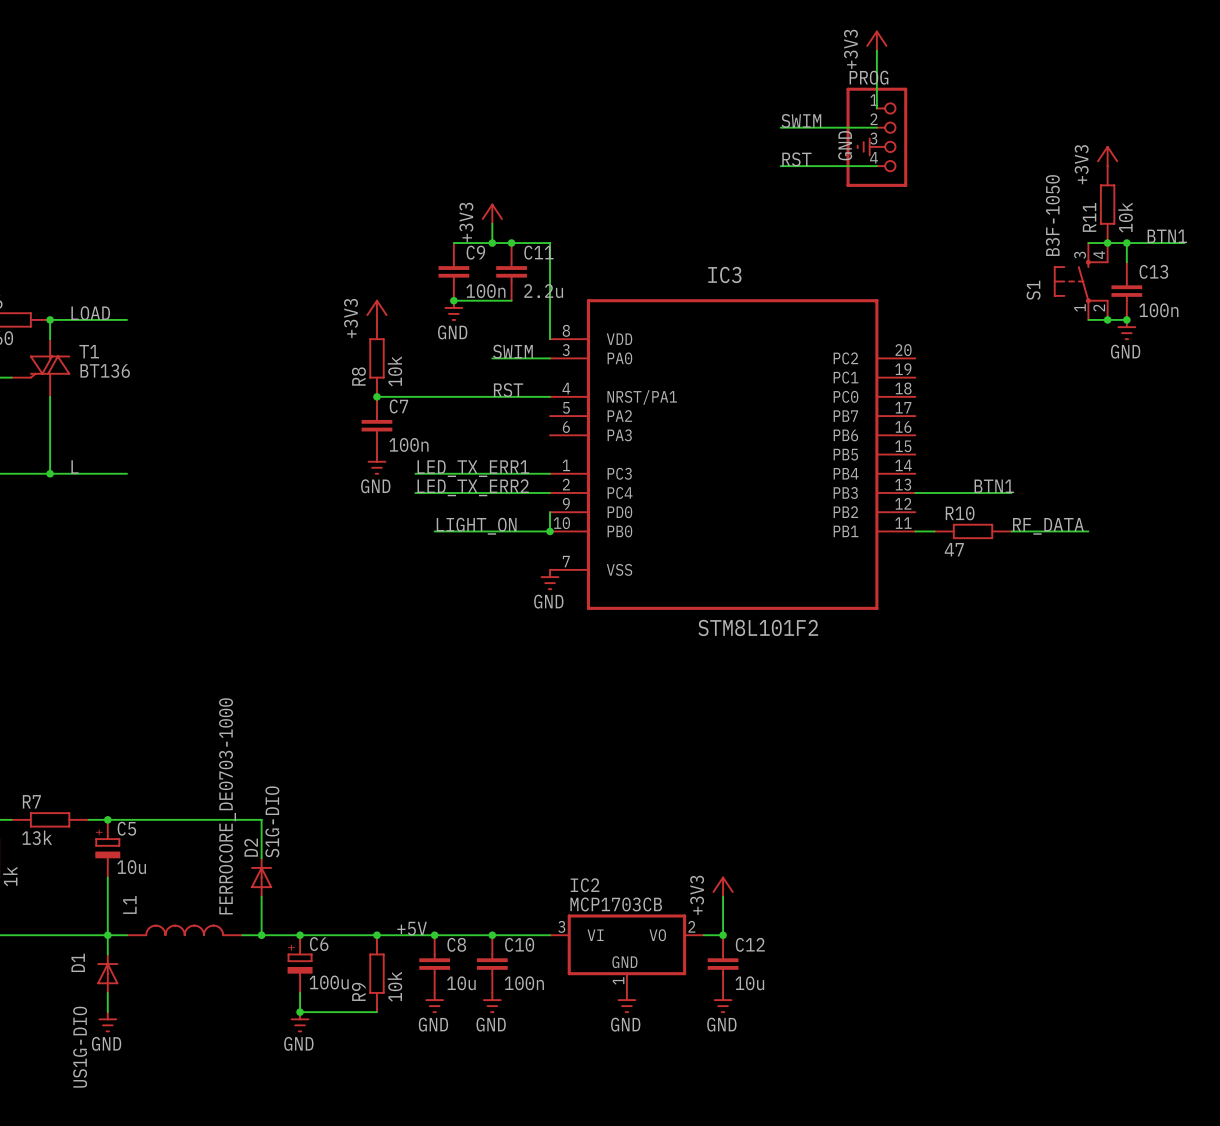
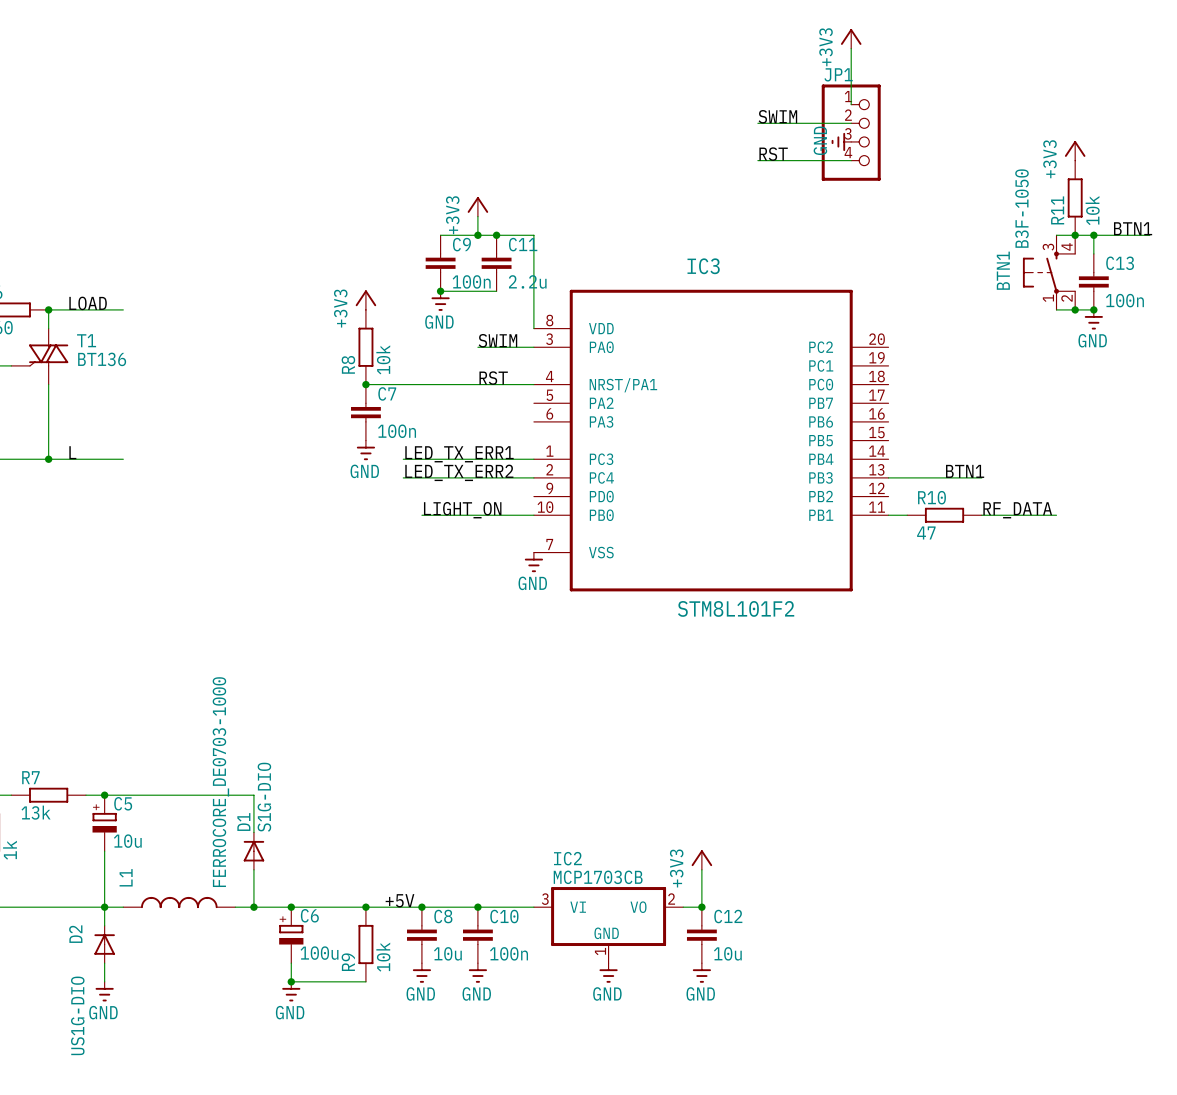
PROG name: PROG (868, 77) -> JP1 (838, 74)
S1 name: S1 (1033, 290) -> BTN1 (1003, 270)
wire: (550, 512) (550, 531) -> none
junction: (550, 531) -> none
D2 name: D2 (251, 847) -> D1 (243, 822)
D1 name: D1 (78, 962) -> D2 (75, 934)

